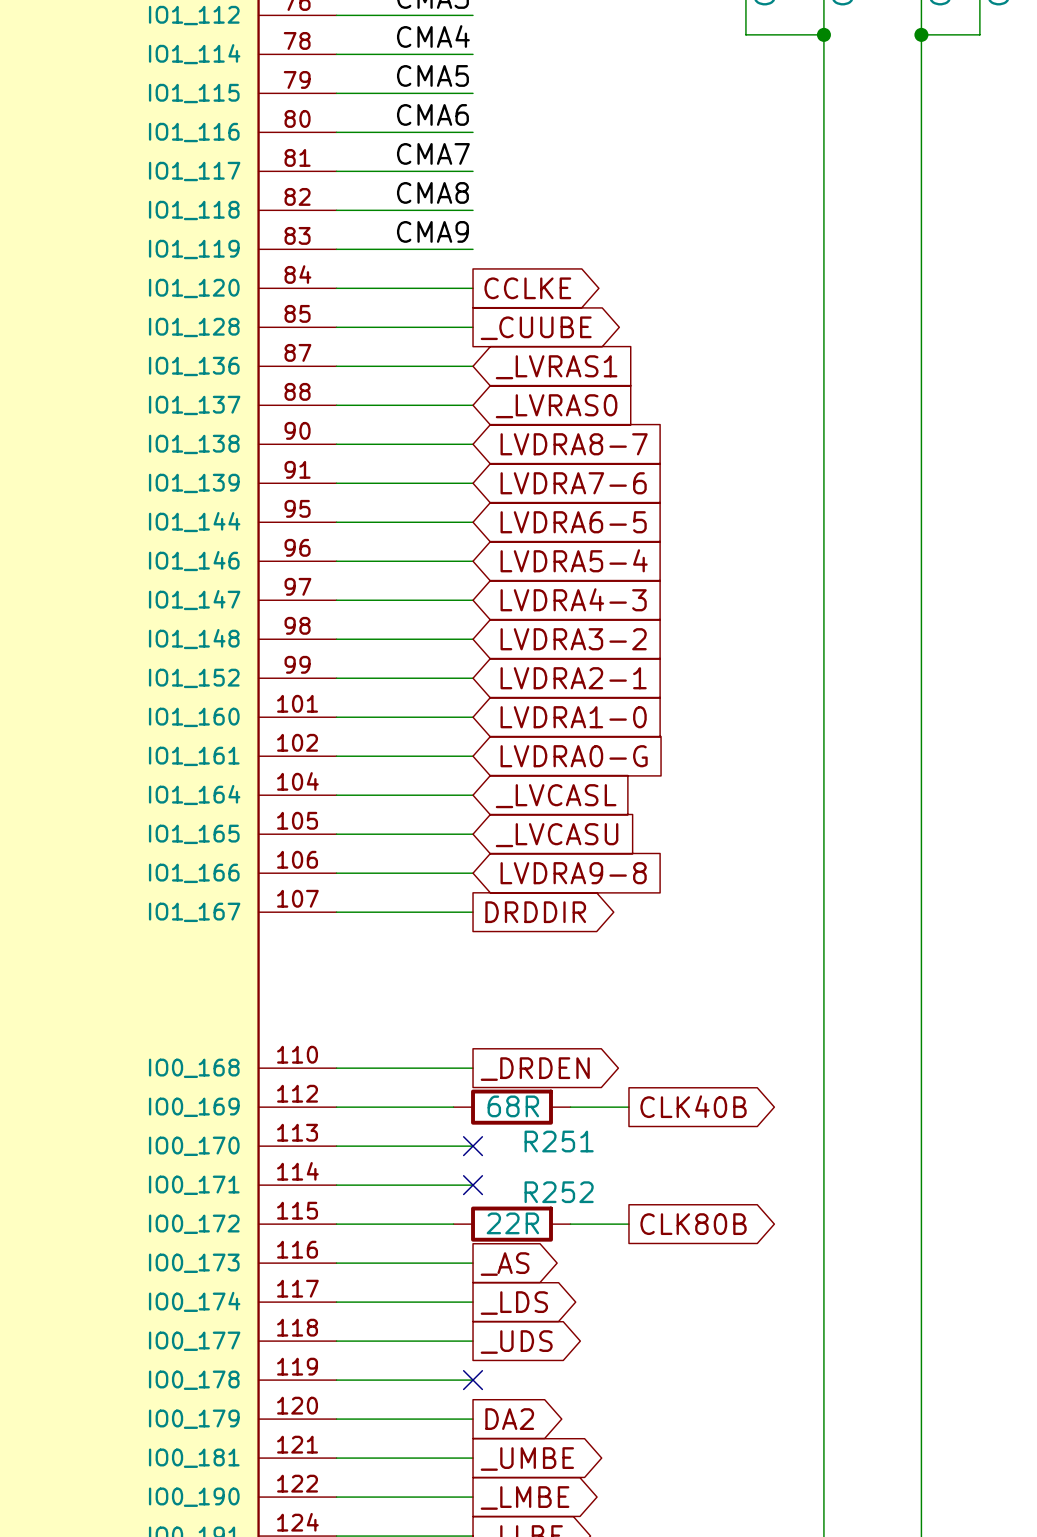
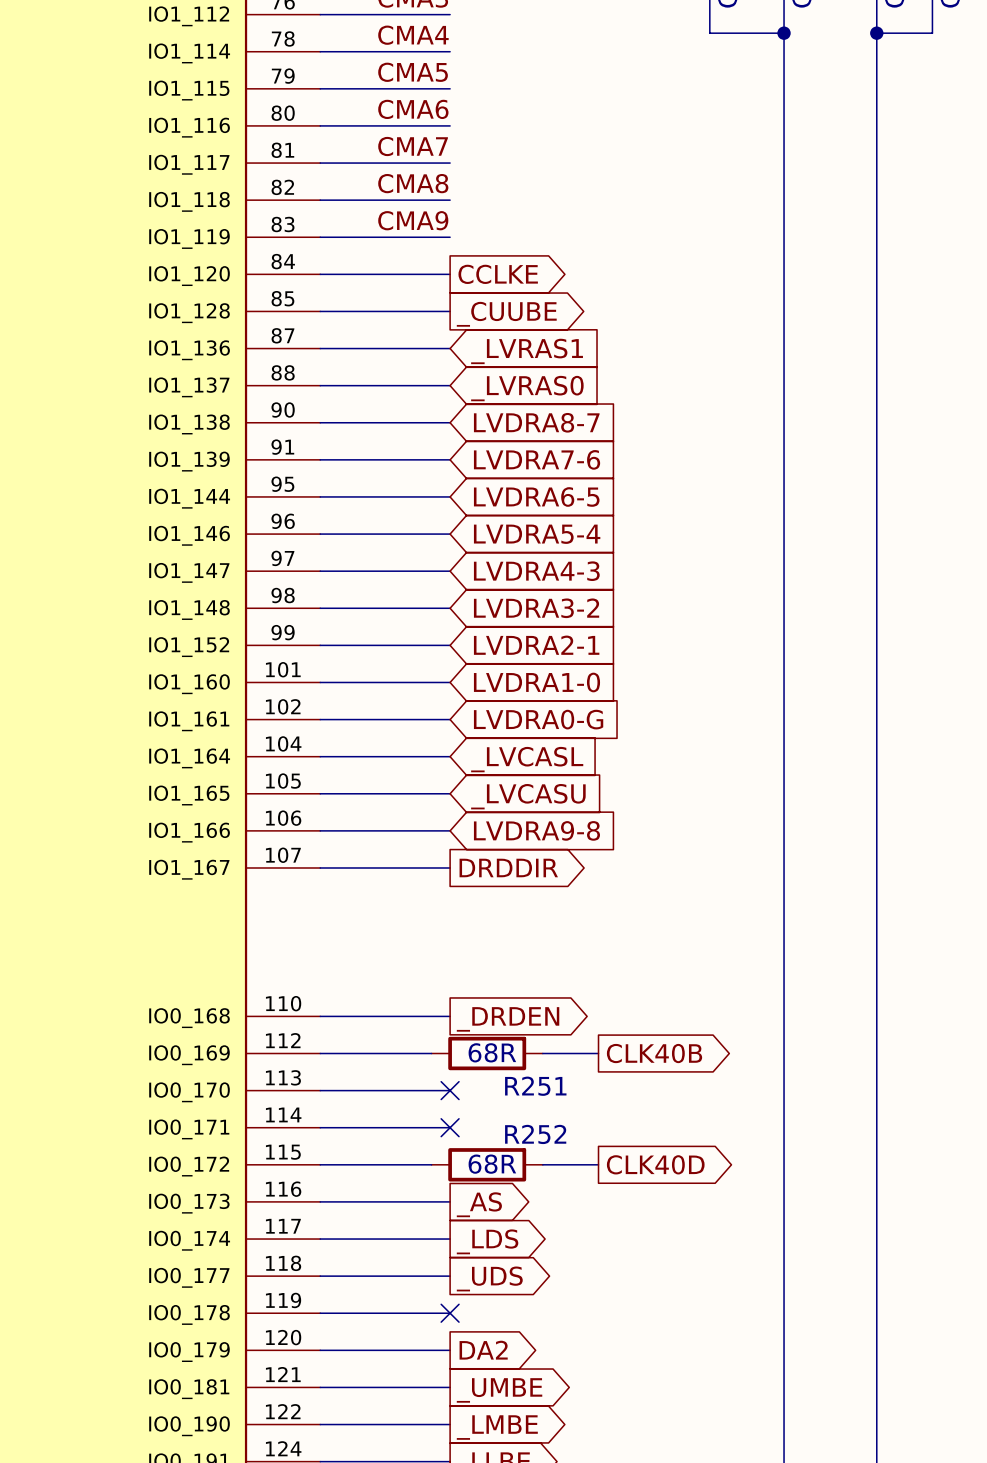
R252 value: 22R (512, 1223) -> 68R (492, 1164)
global label: CLK80B (693, 1224) -> CLK40D (655, 1164)

